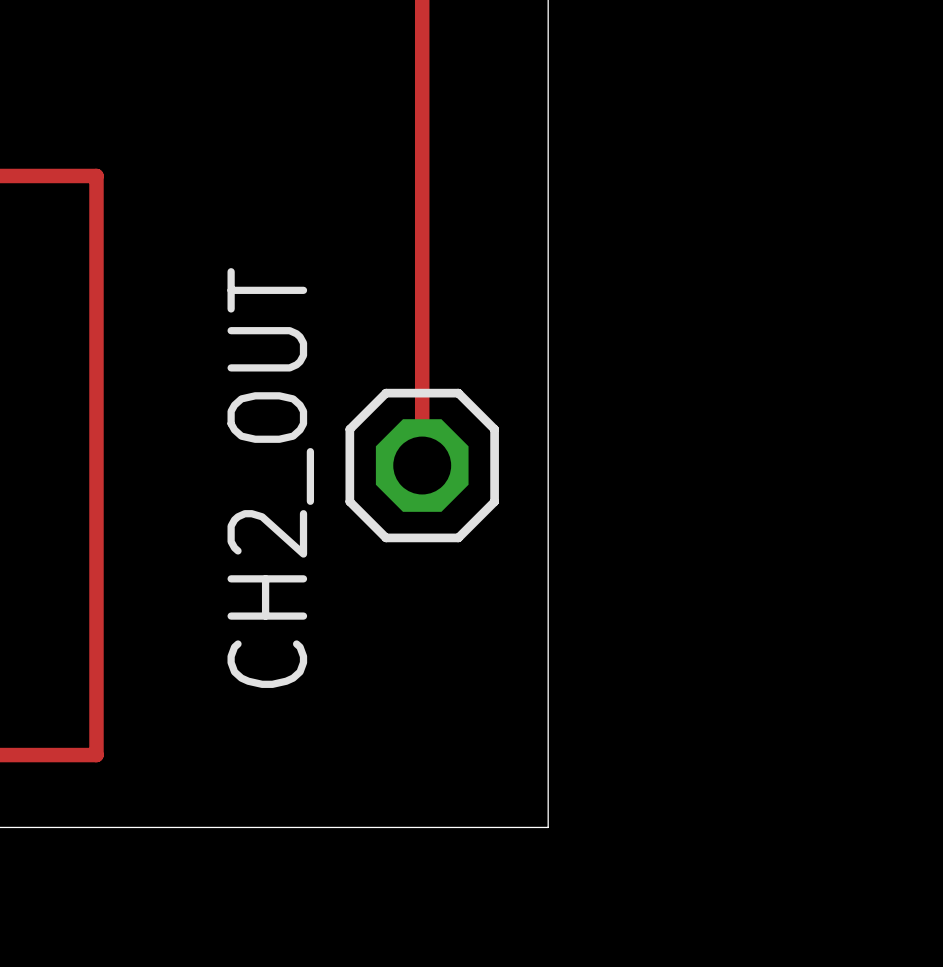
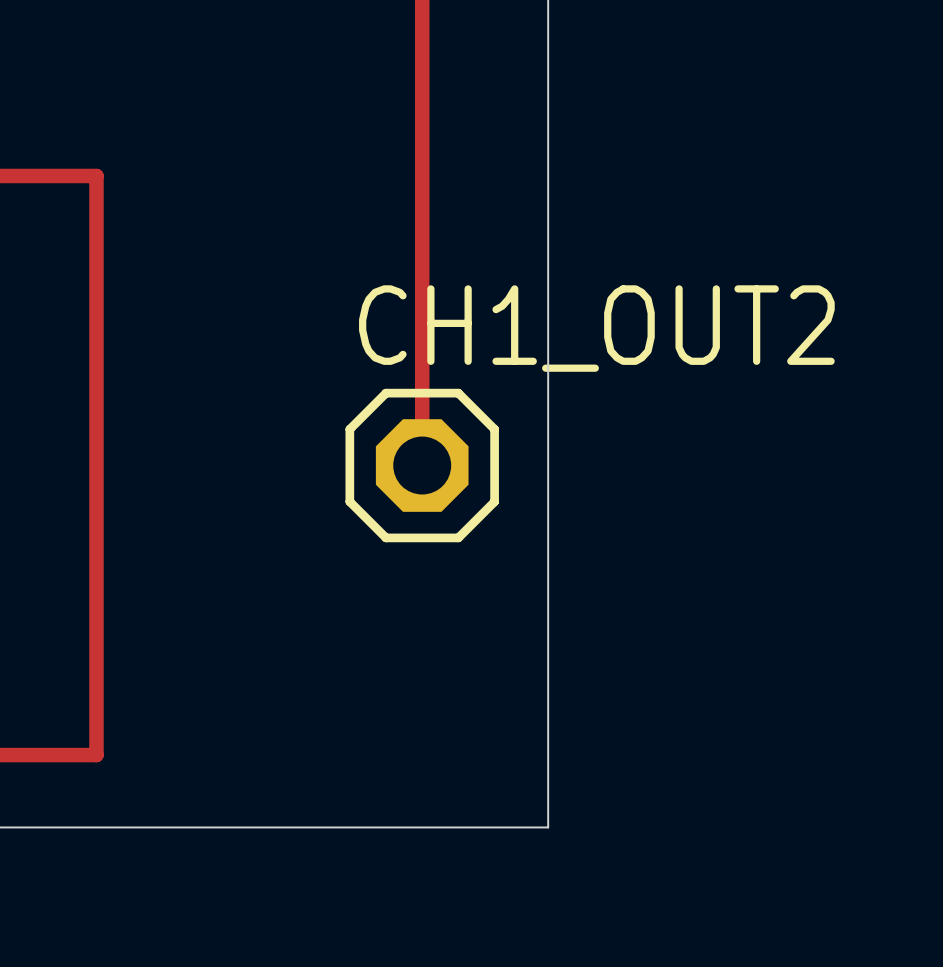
CH2_OUT name: CH2_OUT (270, 478) -> CH1_OUT2 (596, 328)

